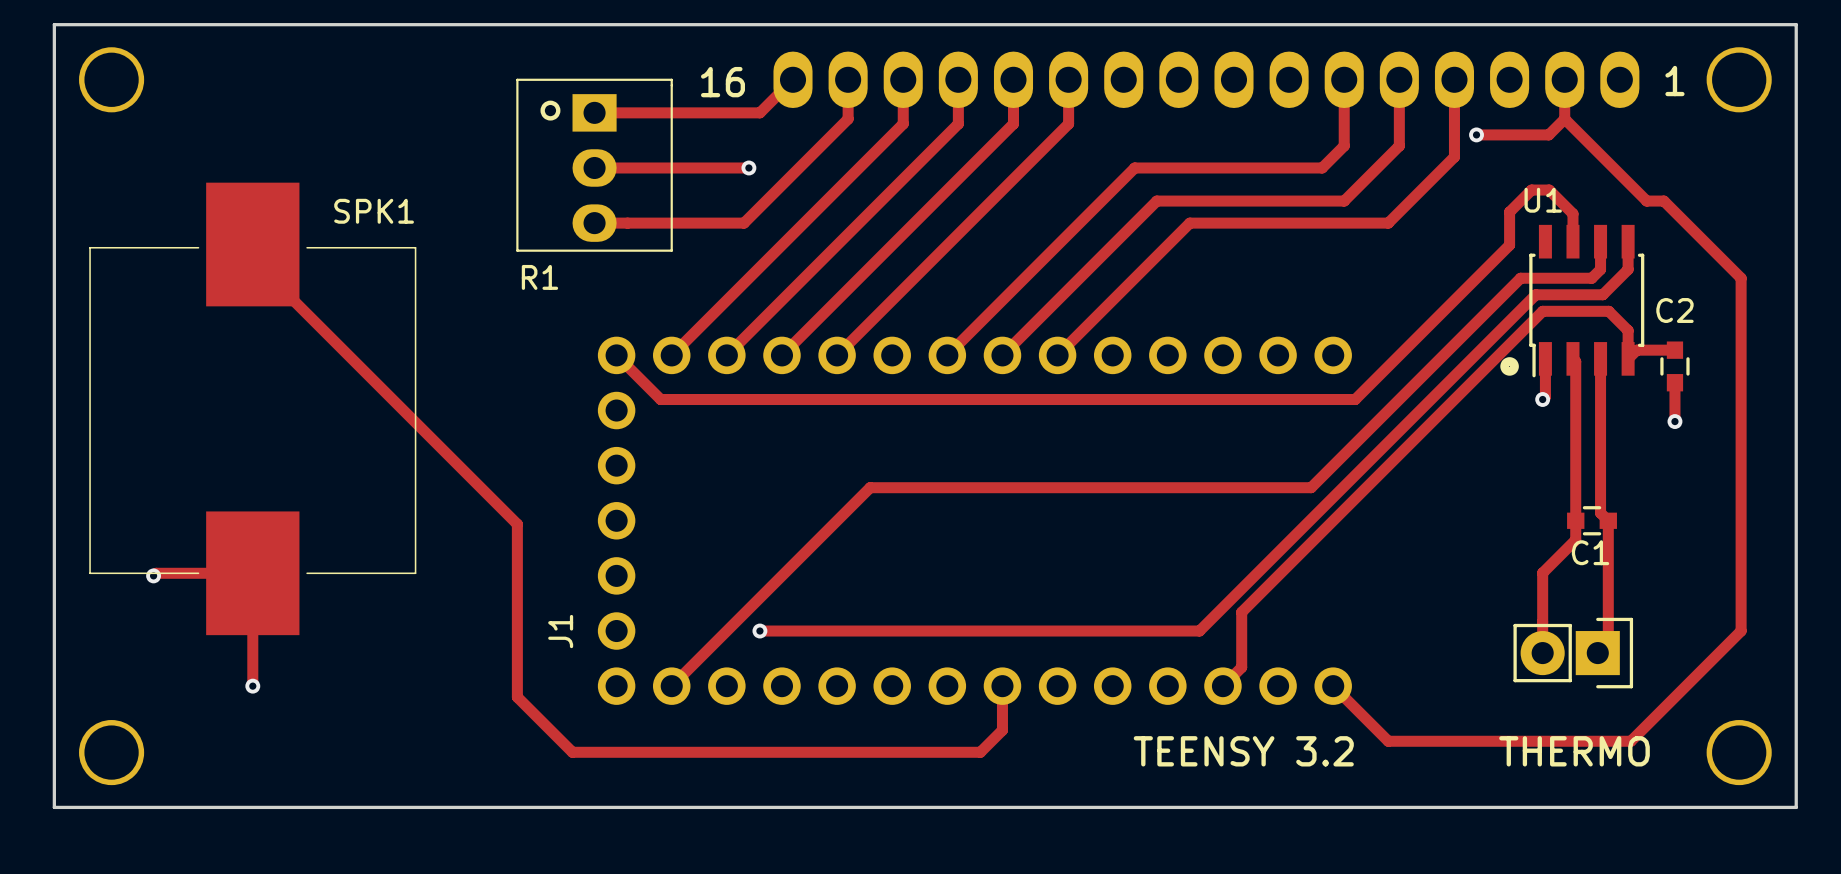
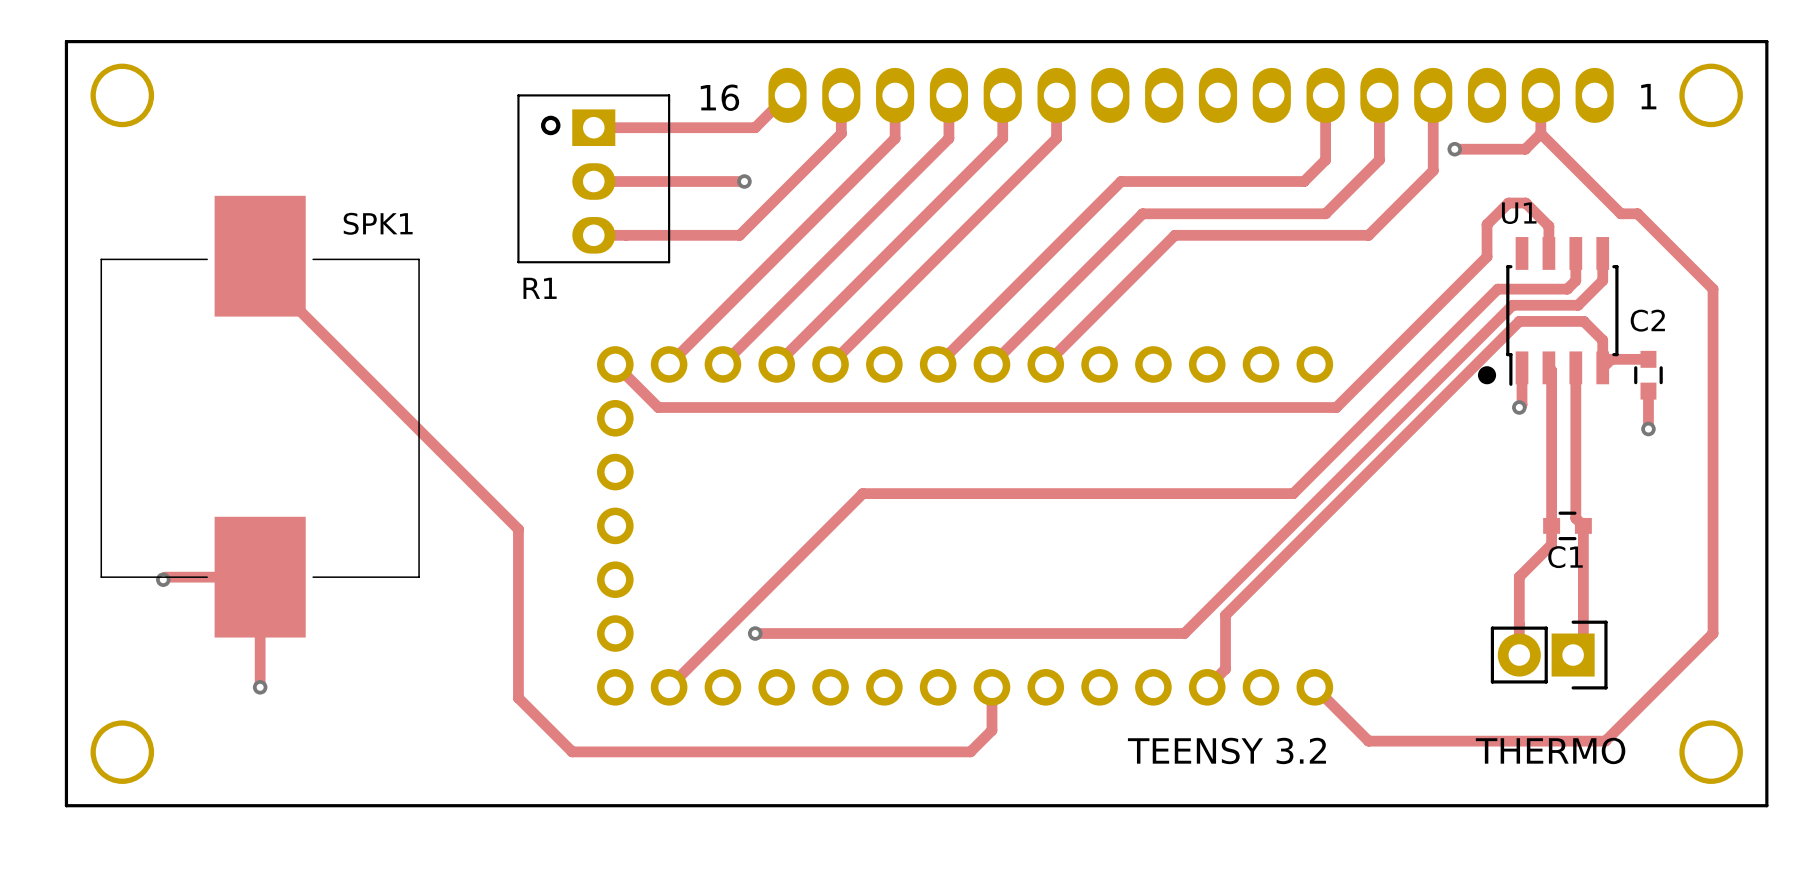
J1 name: J1 (560, 631) -> none

